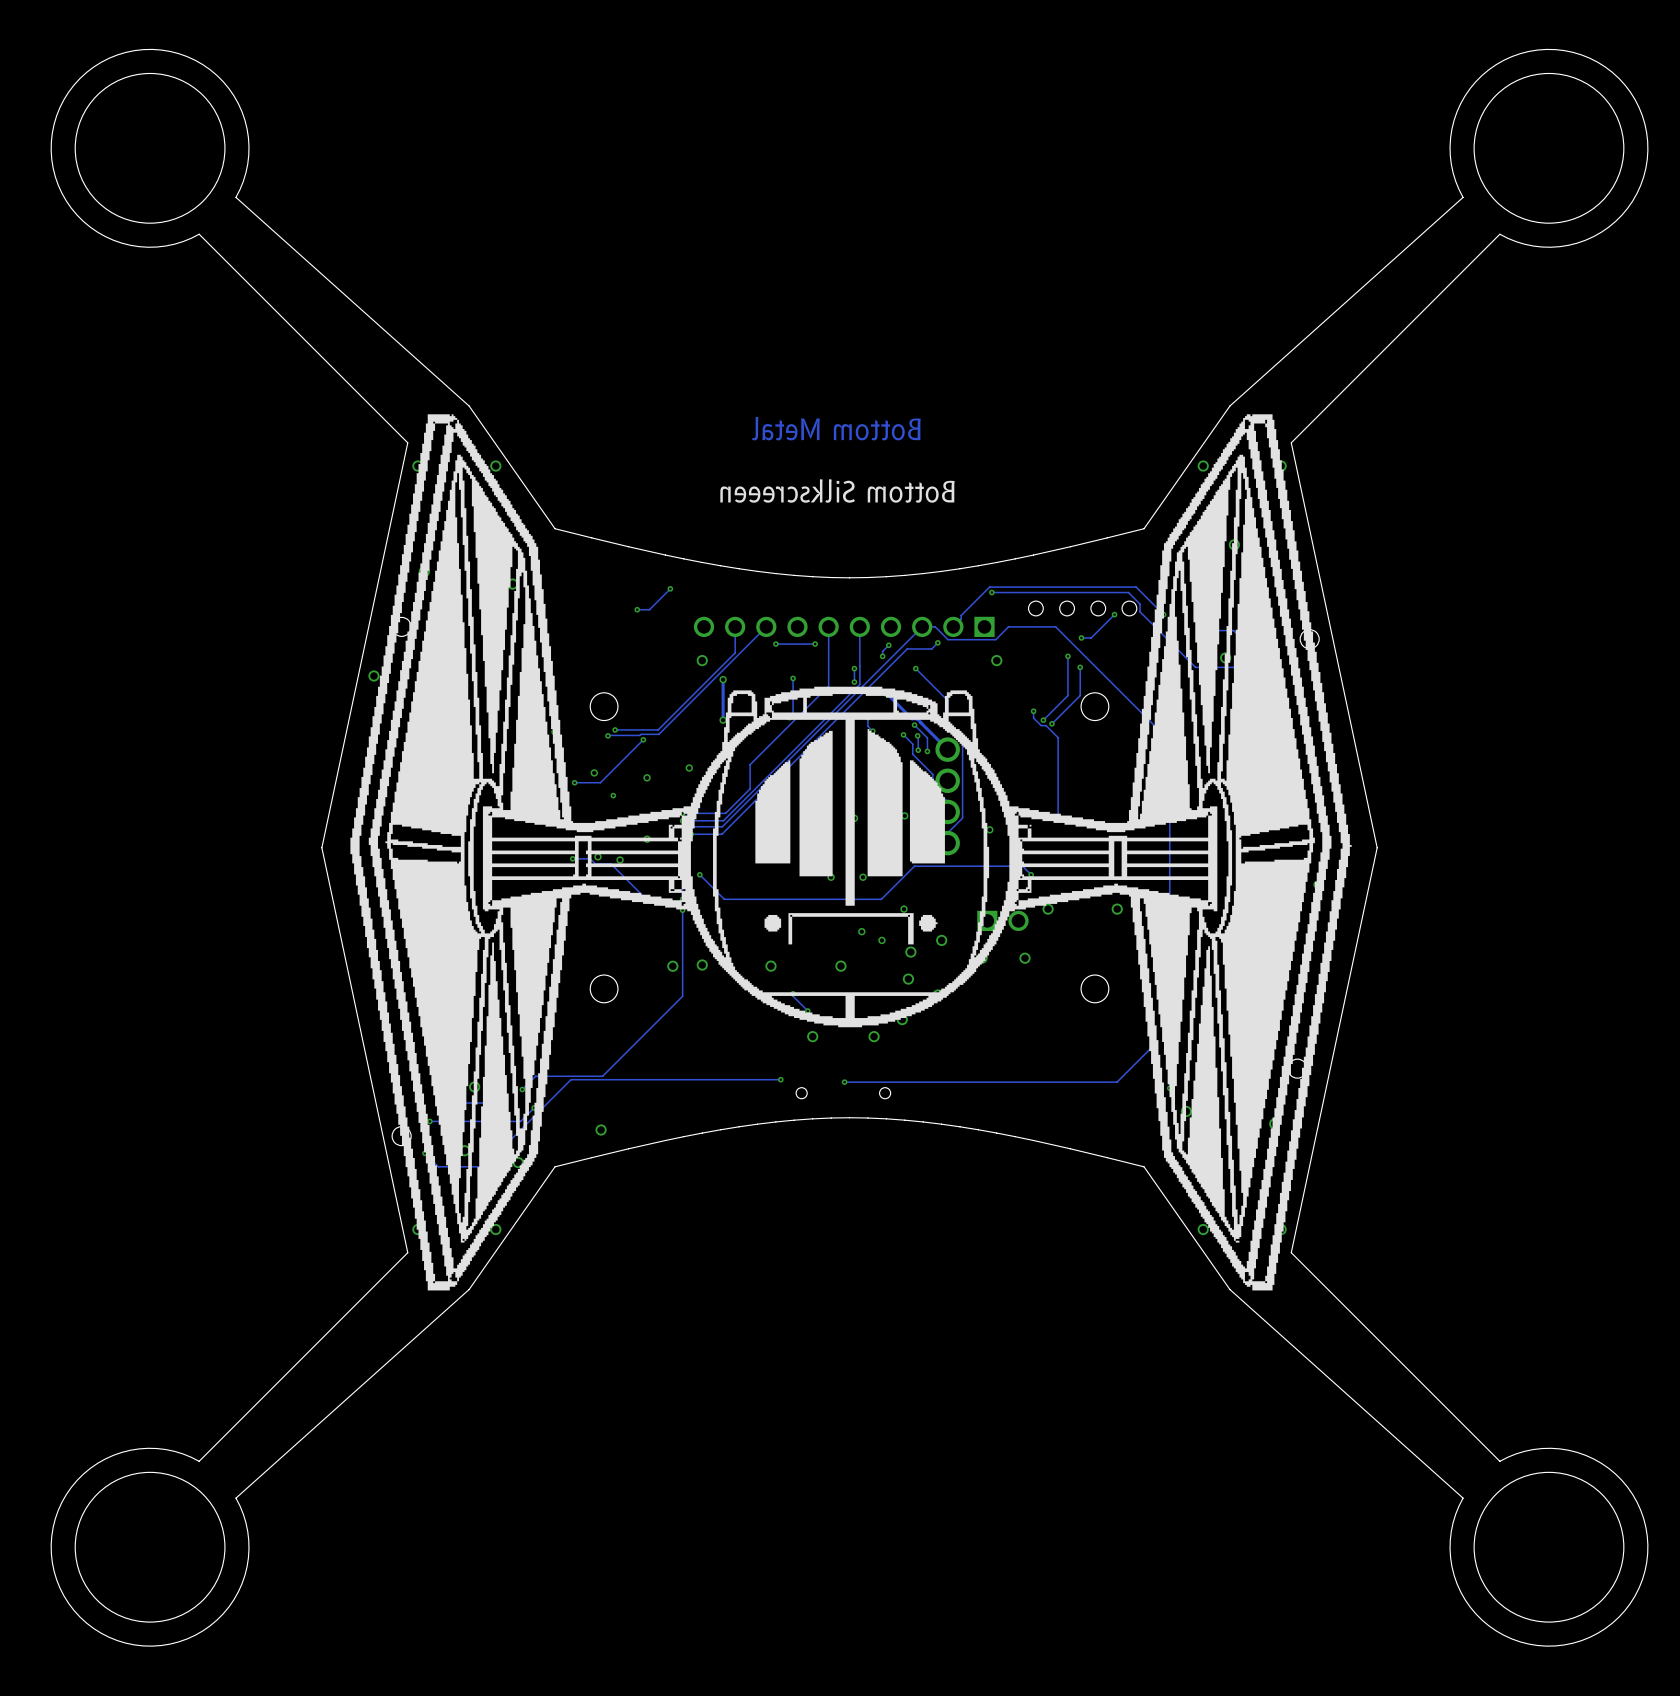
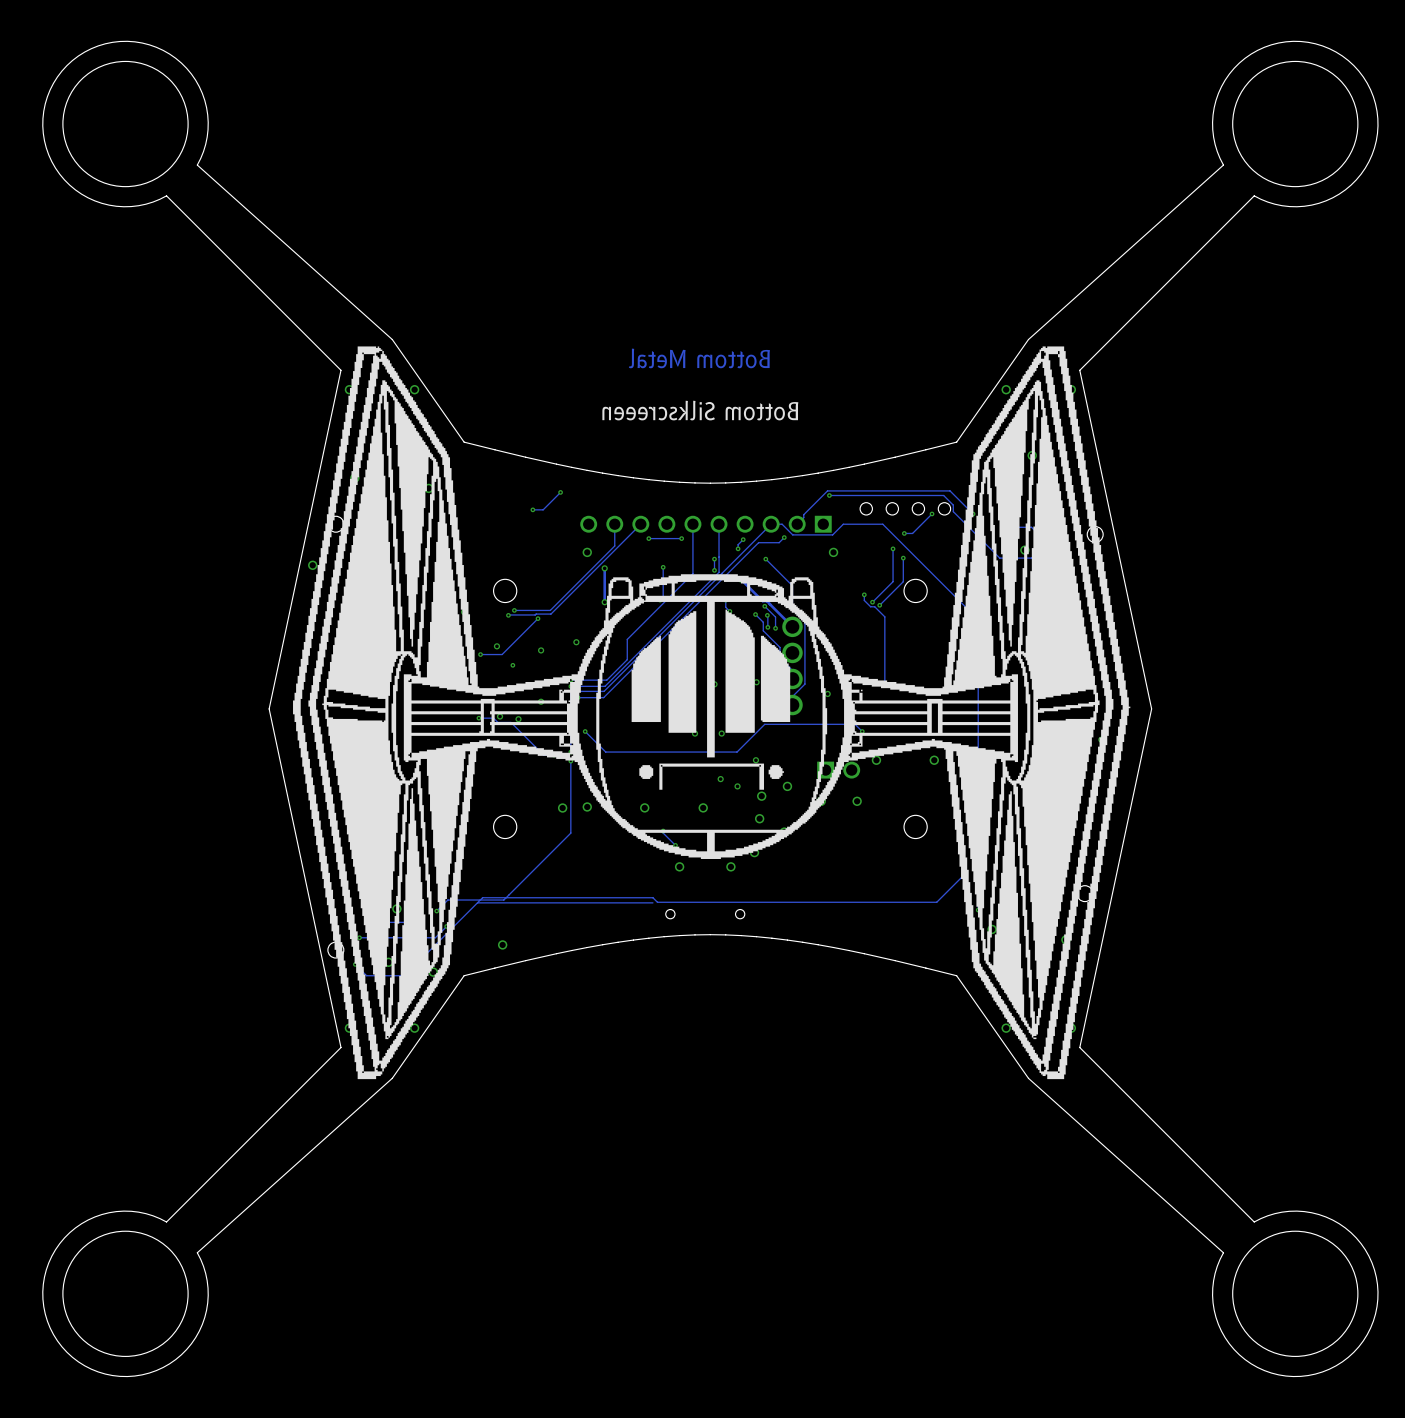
track: (1120, 1078) (1117, 1082) (844, 1082) -> (936, 902) (657, 902) (652, 897) (482, 897) (477, 902)
via: (780, 1079) -> none
via: (844, 1082) -> none

